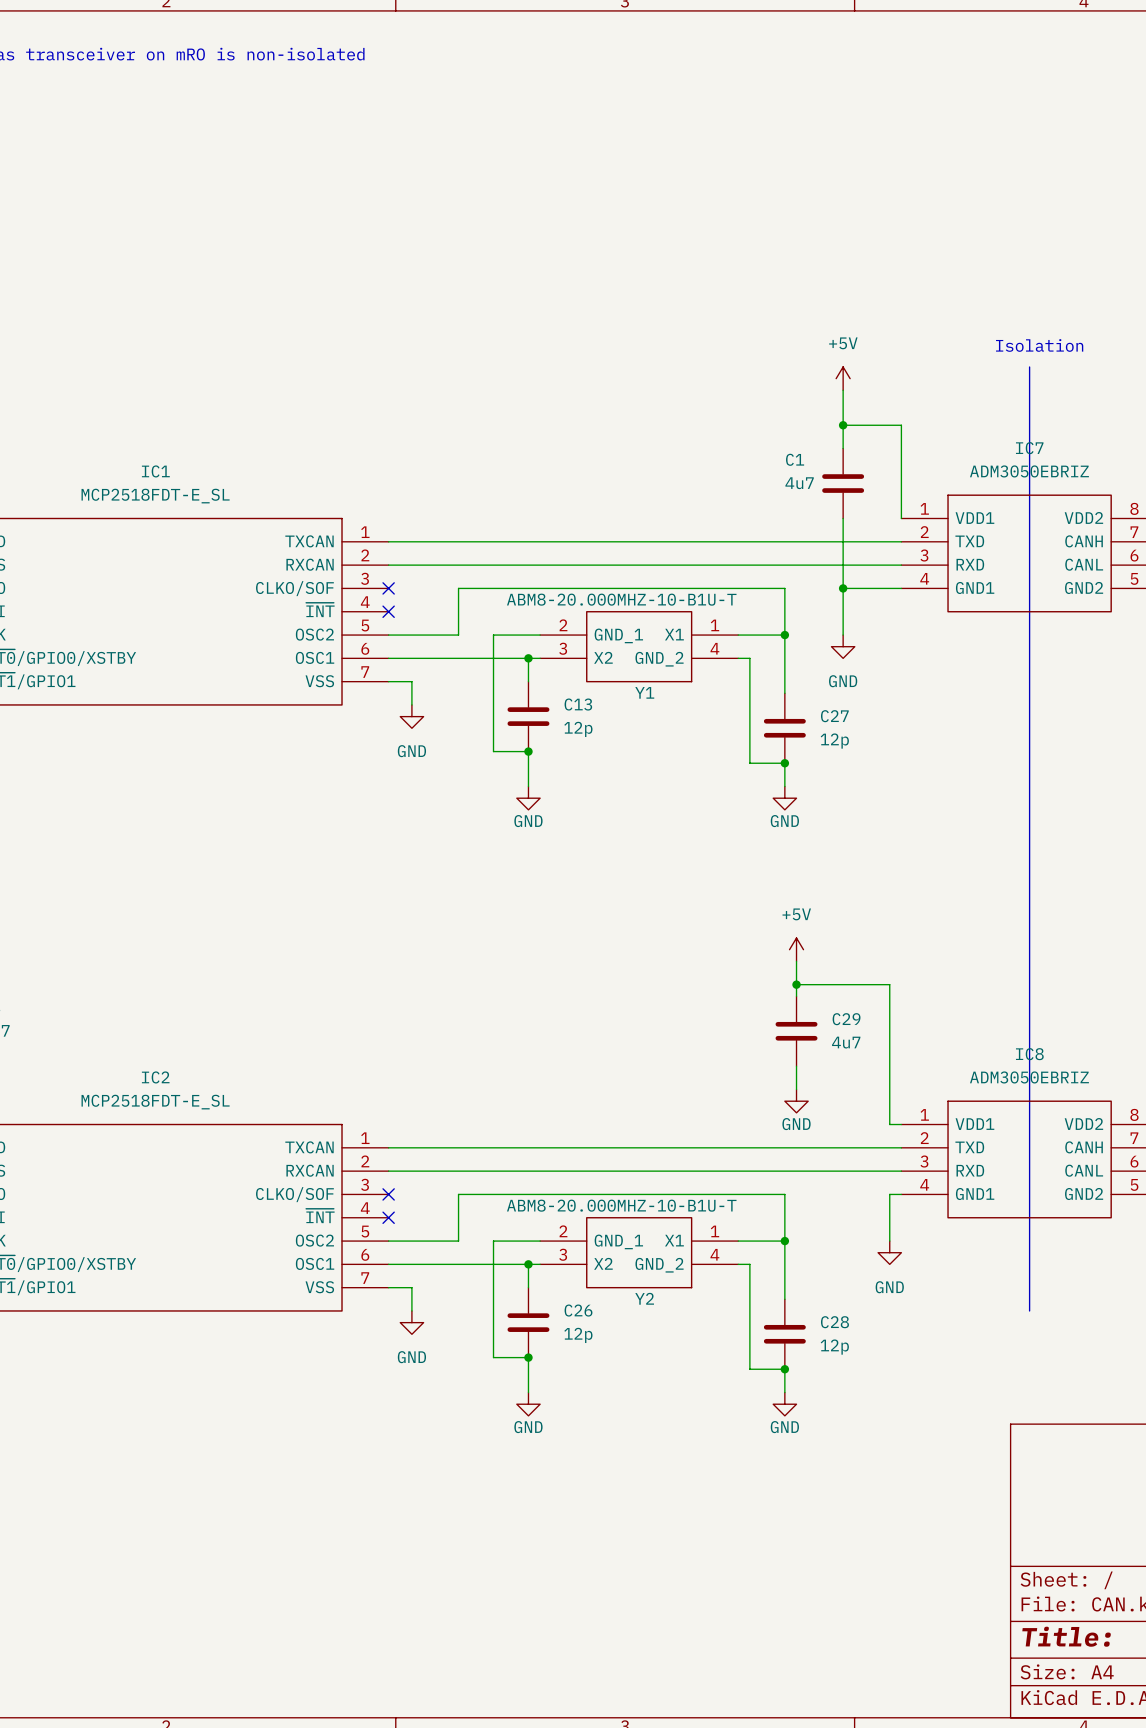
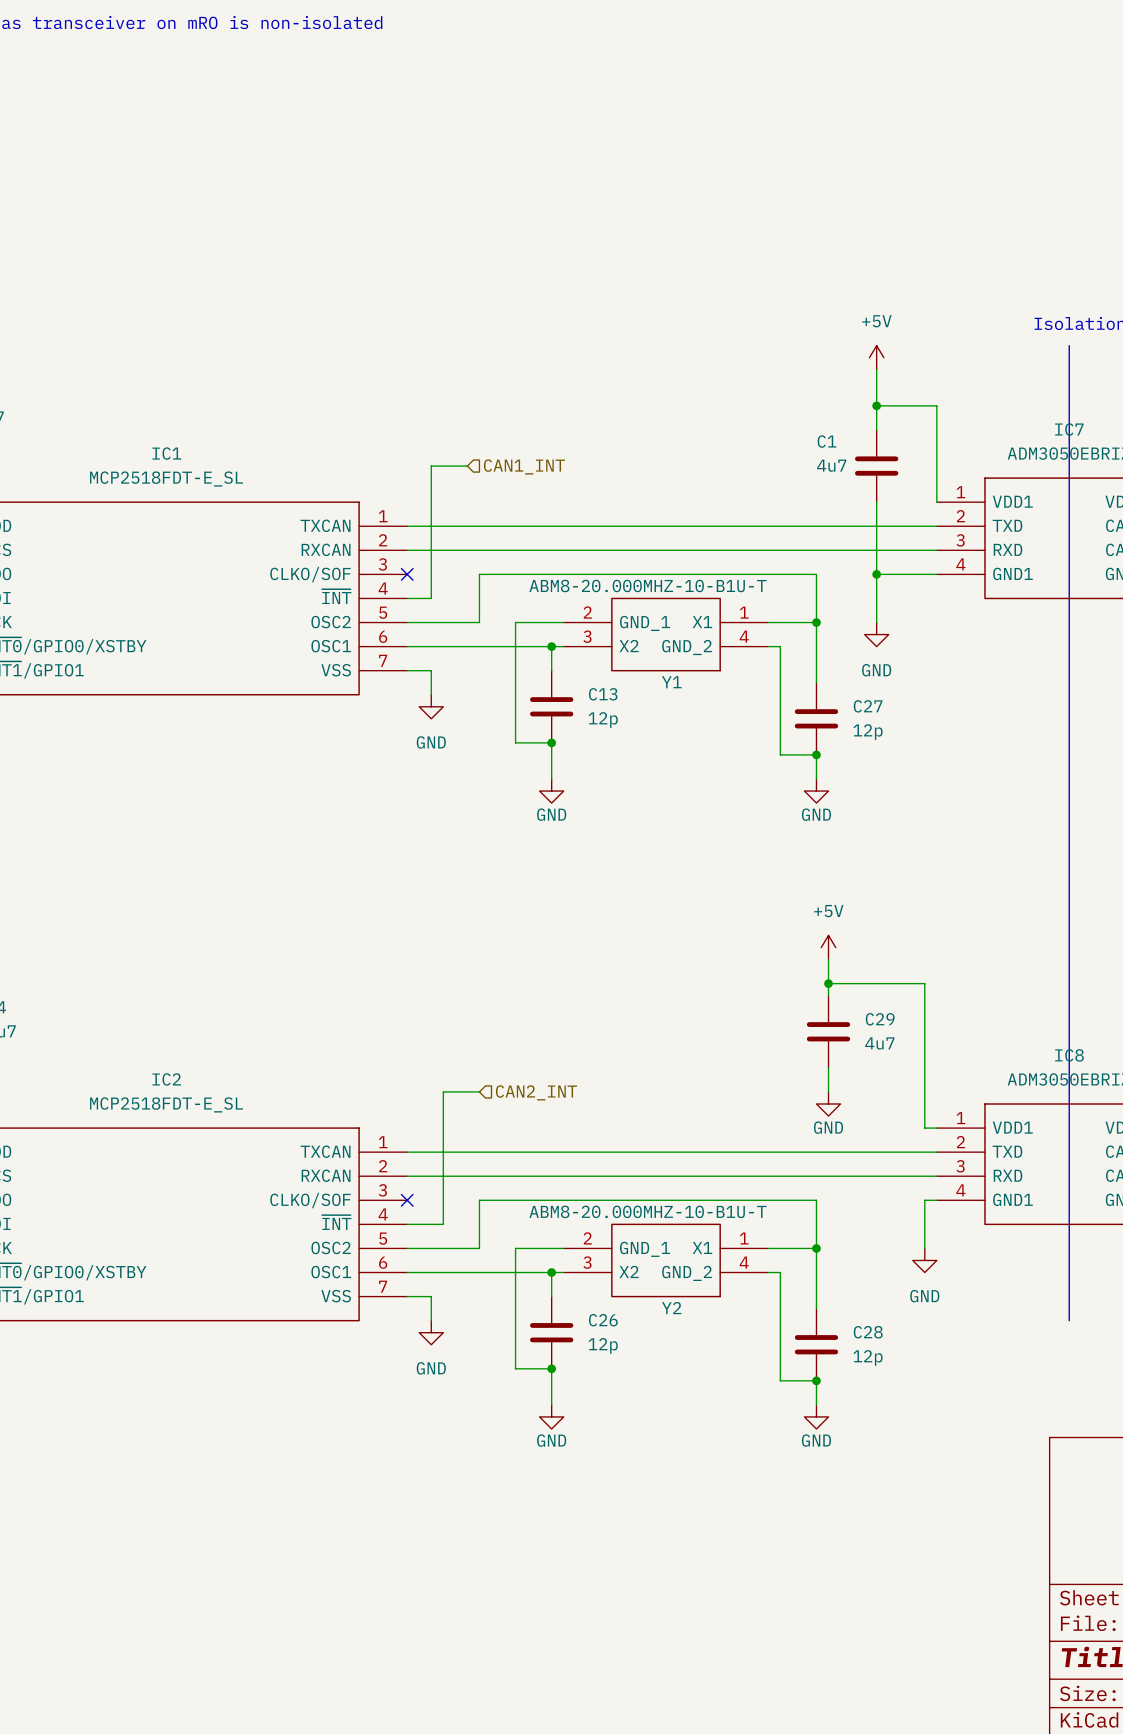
wire: none -> (467, 466) (431, 466) (431, 598) (407, 598)
hierarchical label: none -> CAN1_INT (524, 466)
no-connect mark: (388, 611) -> none
wire: none -> (479, 1091) (443, 1091) (443, 1224) (407, 1224)
hierarchical label: none -> CAN2_INT (536, 1092)
no-connect mark: (388, 1217) -> none

